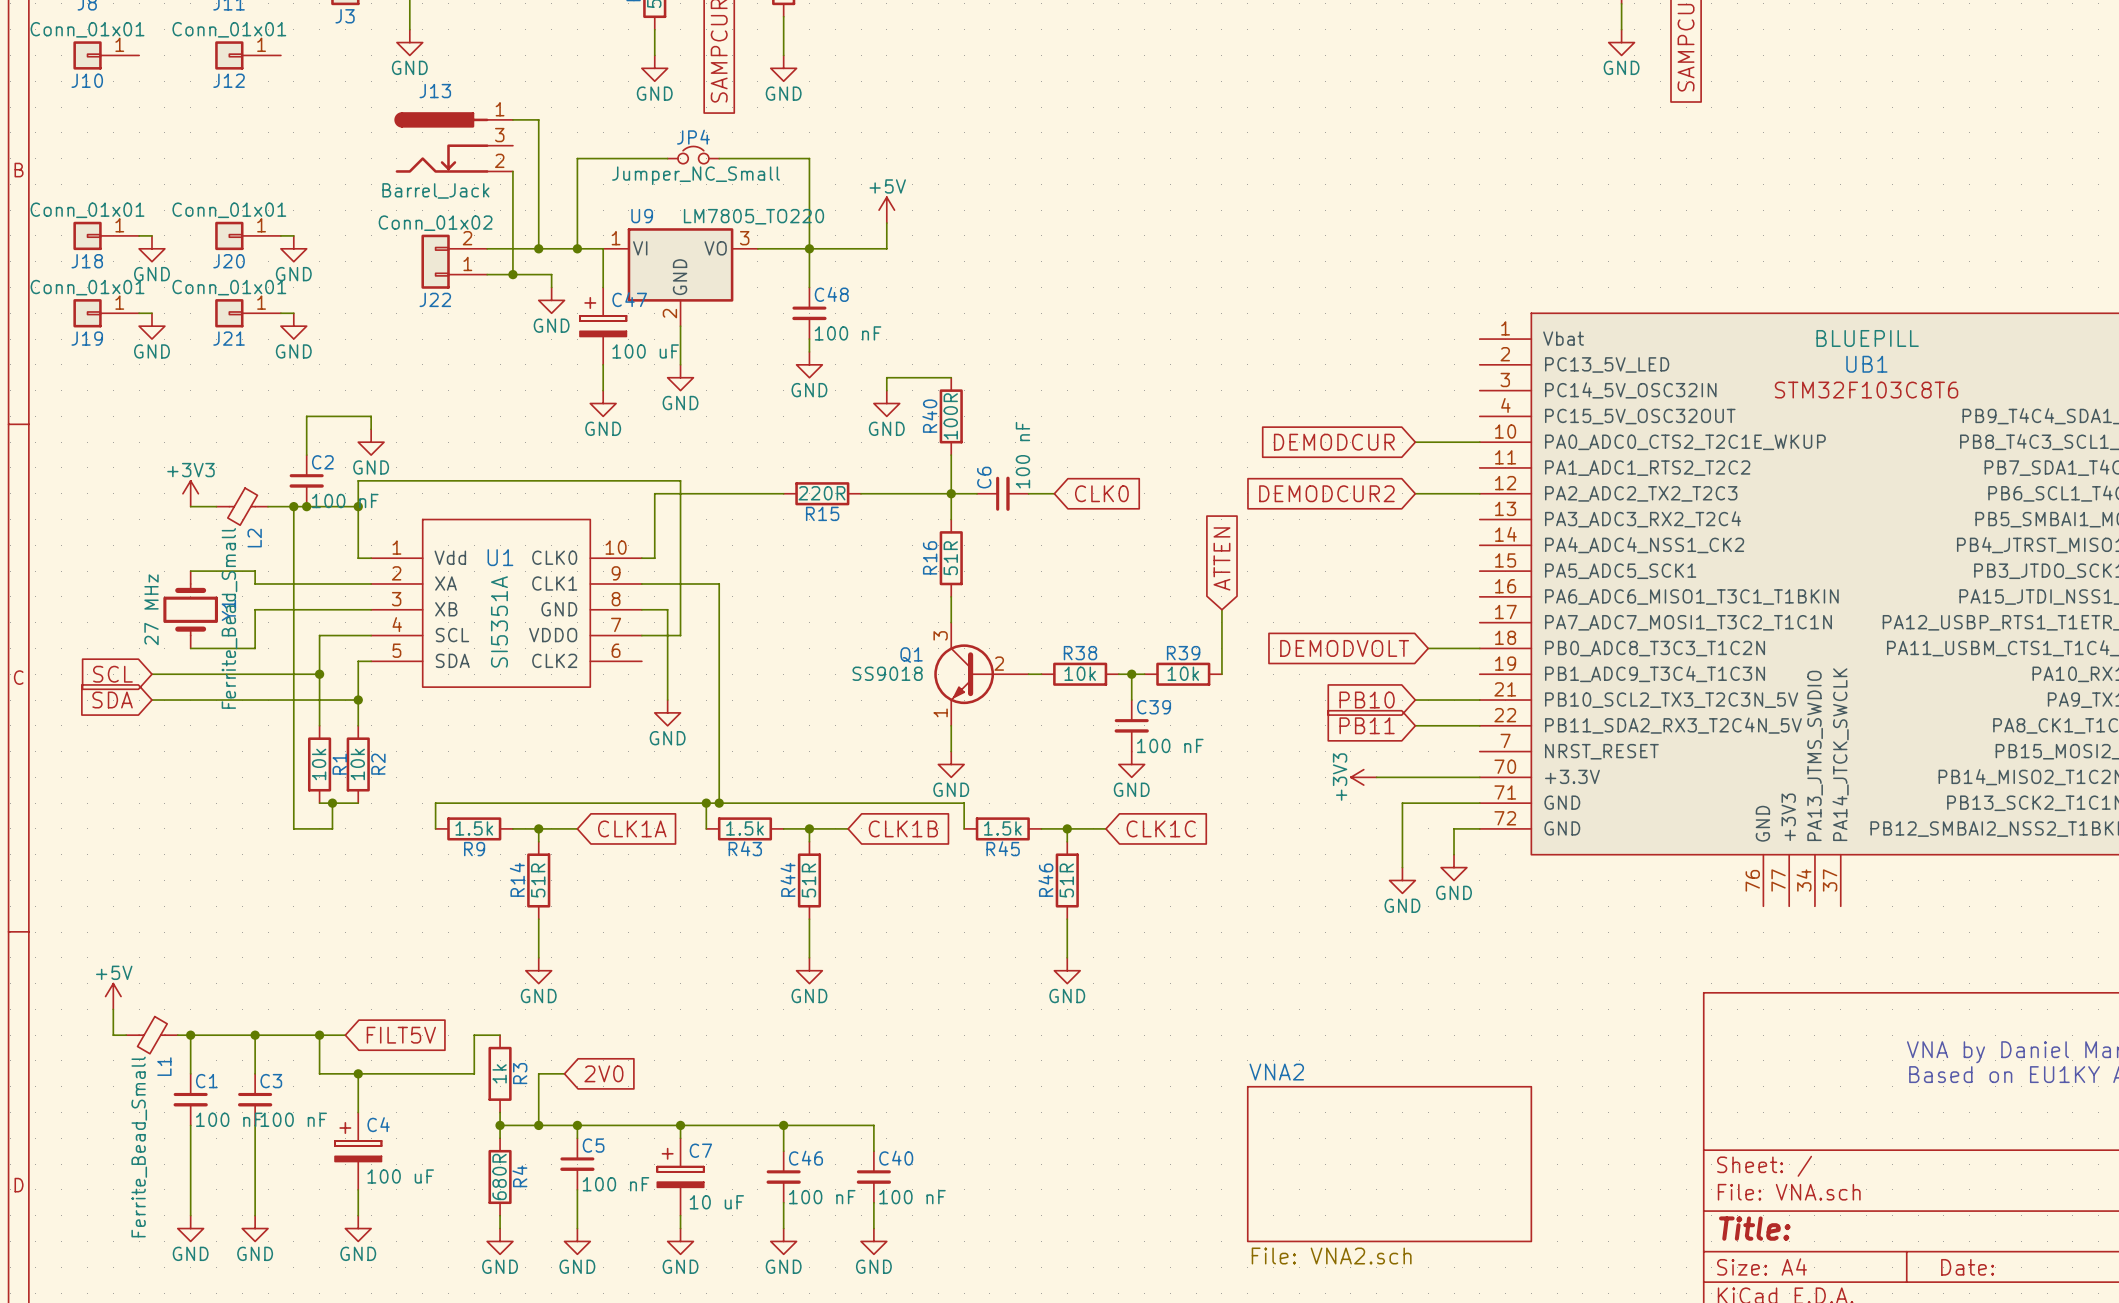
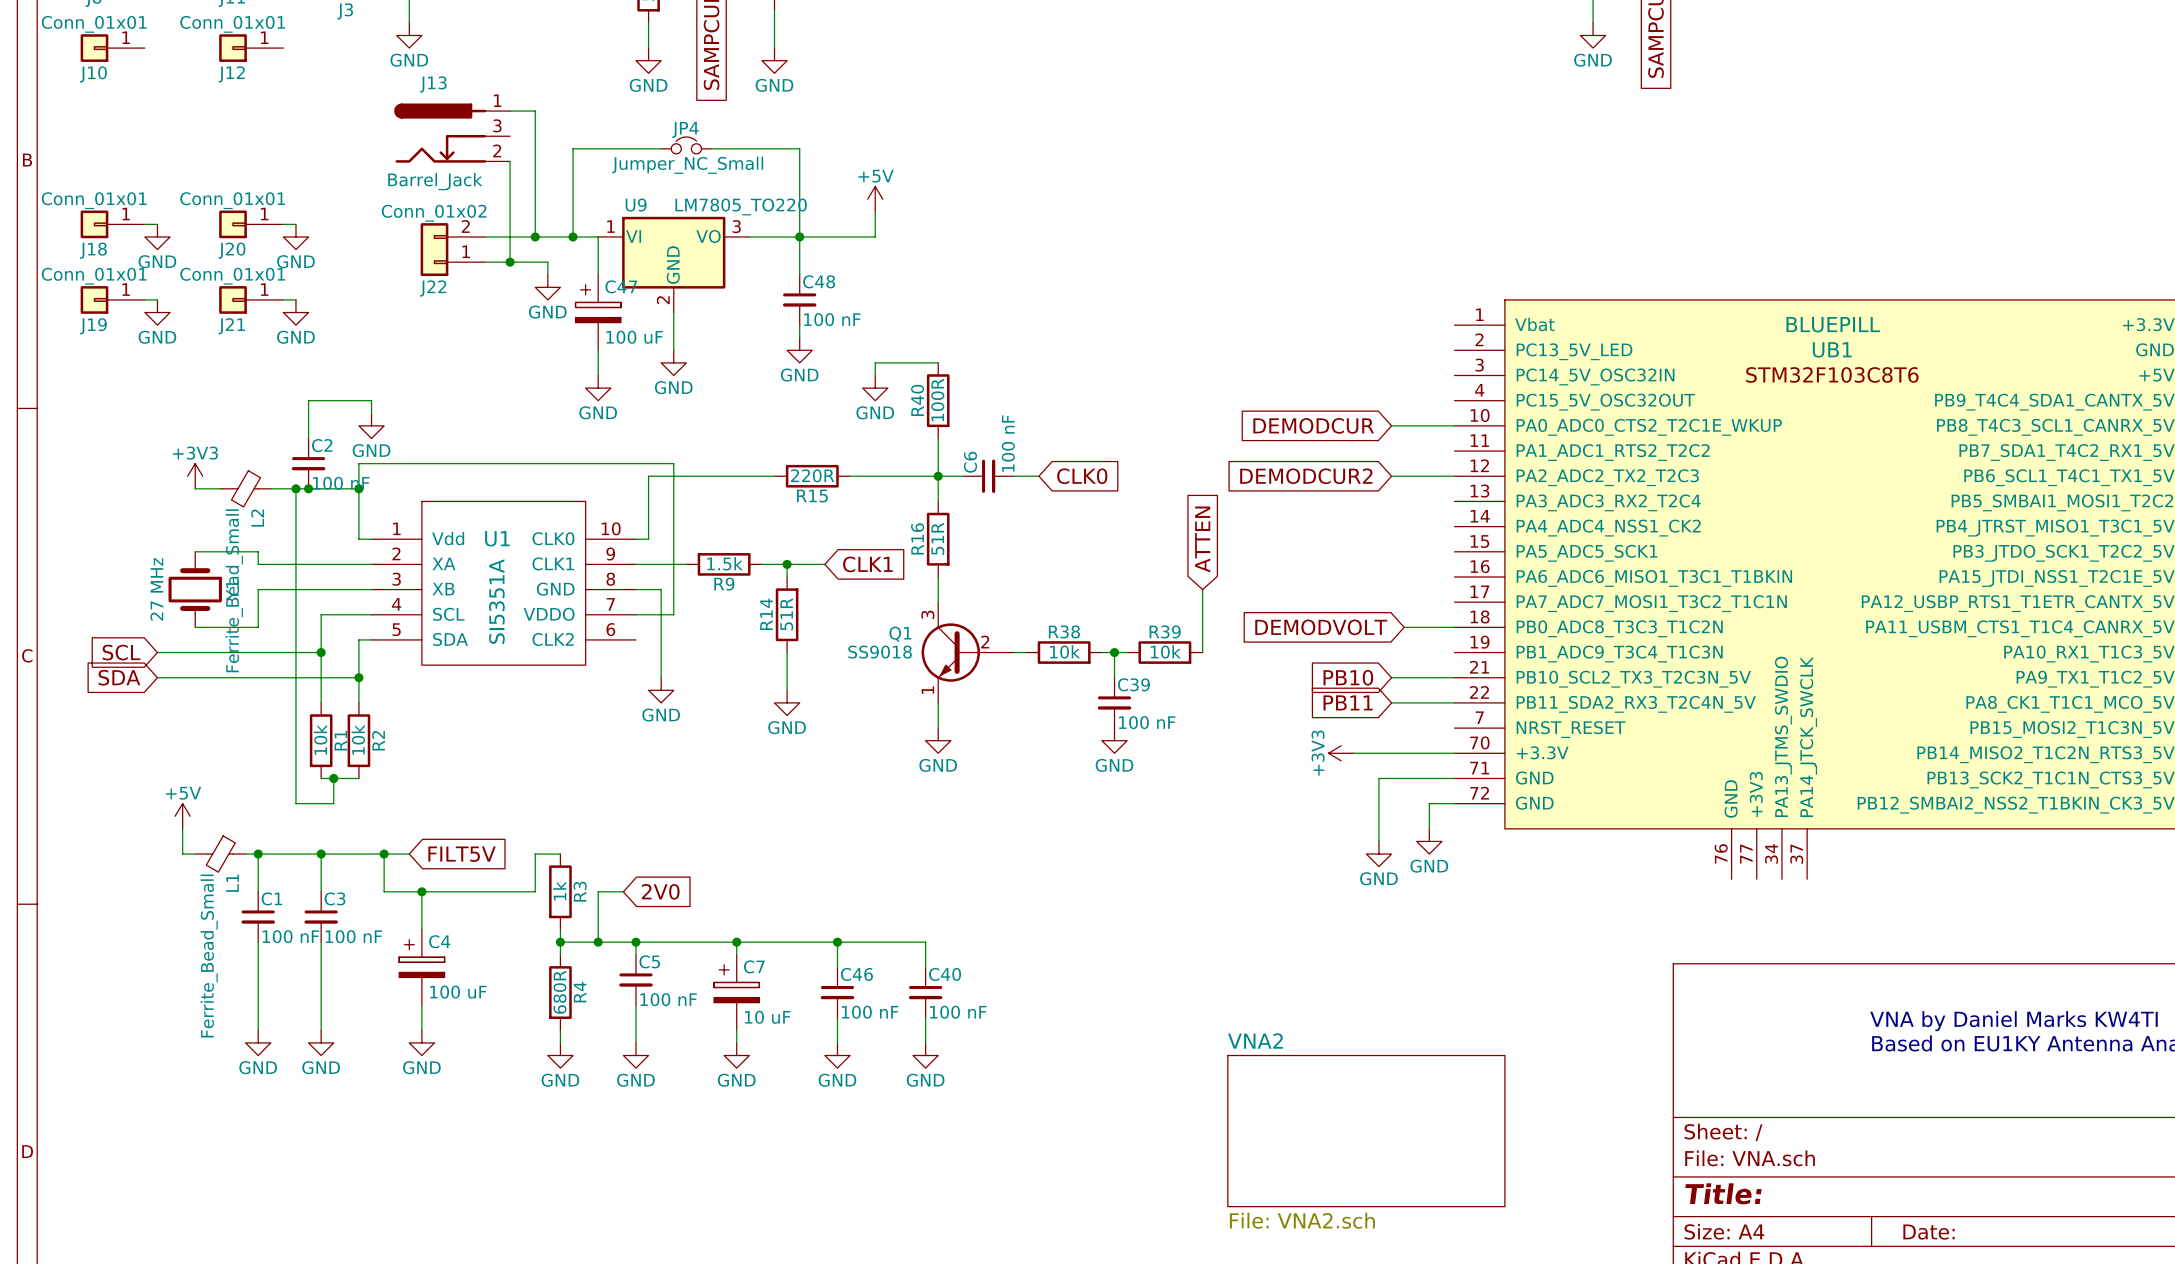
wire: (693, 583) (719, 583) (719, 803) -> none
junction: none -> (787, 564)
global label: none -> CLK1 (867, 564)
power symbol: none -> GND (787, 702)
wire: (706, 803) (706, 828) -> none
junction: (706, 803) -> none
junction: (719, 803) -> none
wire: (435, 828) (435, 803) (964, 803) (964, 828) -> none
R9 position: (474, 828) -> (724, 564)
wire: (512, 828) (577, 828) -> none
wire: (538, 828) (538, 841) -> none
junction: (538, 828) -> none
global label: CLK1A (632, 828) -> none
R43: 1.5k (744, 828) -> none
wire: (783, 828) (848, 828) -> (761, 564) (824, 564)
wire: (809, 828) (809, 841) -> (787, 564) (787, 576)
junction: (809, 828) -> none
global label: CLK1B (903, 828) -> none
R45: 1.5k (1002, 828) -> none
wire: (1041, 828) (1105, 828) -> none
wire: (1067, 828) (1067, 841) -> none
junction: (1067, 828) -> none
global label: CLK1C (1161, 828) -> none
junction: none -> (258, 854)
junction: none -> (321, 854)
wire: none -> (384, 854) (384, 891) (535, 891) (535, 854) (560, 854)
junction: none -> (384, 854)
R14 position: (538, 880) -> (787, 614)
R44: 51R (809, 880) -> none
R46: 51R (1067, 880) -> none
junction: none -> (421, 891)
wire: (538, 919) (538, 957) -> (321, 854) (321, 891)
wire: none -> (623, 891) (598, 891) (598, 942)
wire: (809, 919) (809, 957) -> (787, 652) (787, 690)
wire: (1067, 919) (1067, 957) -> none
wire: none -> (258, 942) (258, 1005)
wire: none -> (321, 942) (321, 1005)
power symbol: GND (538, 970) -> none
junction: none -> (560, 942)
junction: none -> (598, 942)
junction: none -> (635, 942)
junction: none -> (736, 942)
power symbol: GND (809, 970) -> none
junction: none -> (837, 942)
power symbol: GND (1067, 970) -> none
power symbol position: +5V (113, 996) -> +5V (182, 816)
wire: (113, 1009) (113, 1035) (126, 1035) -> (182, 828) (182, 854) (195, 854)
L1 position: (151, 1035) -> (220, 854)
wire: (177, 1035) (345, 1035) -> (245, 854) (409, 854)
wire: (190, 1035) (190, 1073) -> (258, 854) (258, 891)
junction: (190, 1035) -> none
junction: (255, 1035) -> none
junction: (319, 1035) -> none
global label position: FILT5V (401, 1035) -> FILT5V (462, 854)
wire: (500, 1035) (474, 1035) (474, 1073) (319, 1073) (319, 1060) -> none
power symbol: none -> GND (258, 1042)
power symbol: none -> GND (321, 1042)
wire: (358, 1073) (358, 1112) -> (421, 891) (421, 929)
junction: (358, 1073) -> none
power symbol: none -> GND (421, 1042)
R3 position: (500, 1073) -> (560, 891)
wire: (564, 1073) (538, 1073) (538, 1125) -> (560, 1042) (560, 1030)
global label position: 2V0 (603, 1073) -> 2V0 (660, 891)
power symbol: none -> GND (560, 1055)
power symbol: none -> GND (635, 1055)
power symbol: none -> GND (736, 1055)
power symbol: none -> GND (837, 1055)
power symbol: none -> GND (925, 1055)
C1 position: (190, 1099) -> (258, 916)
C3 position: (255, 1099) -> (321, 916)
wire: (500, 1112) (500, 1138) -> (560, 929) (560, 954)
wire: (190, 1125) (190, 1215) -> none
wire: (255, 1125) (255, 1215) -> none
wire: (500, 1125) (873, 1125) (873, 1151) -> (560, 942) (925, 942) (925, 967)
junction: (500, 1125) -> none
junction: (538, 1125) -> none
wire: (577, 1125) (577, 1138) -> (635, 942) (635, 954)
junction: (577, 1125) -> none
wire: (680, 1125) (680, 1138) -> (736, 942) (736, 954)
junction: (680, 1125) -> none
wire: (783, 1125) (783, 1151) -> (837, 942) (837, 967)
junction: (783, 1125) -> none
C4 position: (358, 1151) -> (421, 967)
C5 position: (577, 1164) -> (635, 979)
R4 position: (500, 1176) -> (560, 992)
C7 position: (680, 1176) -> (736, 992)
C46 position: (783, 1176) -> (837, 992)
C40 position: (873, 1176) -> (925, 992)
wire: (358, 1189) (358, 1215) -> (421, 1005) (421, 1030)
wire: (577, 1189) (577, 1228) -> (635, 1005) (635, 1042)
wire: (783, 1202) (783, 1228) -> (837, 1017) (837, 1042)
wire: (873, 1202) (873, 1228) -> (925, 1017) (925, 1042)
wire: (500, 1215) (500, 1228) -> none
wire: (680, 1215) (680, 1228) -> (736, 1030) (736, 1042)
power symbol: GND (190, 1228) -> none
power symbol: GND (255, 1228) -> none
power symbol: GND (358, 1228) -> none
power symbol: GND (500, 1241) -> none
power symbol: GND (577, 1241) -> none
power symbol: GND (680, 1241) -> none
power symbol: GND (783, 1241) -> none
power symbol: GND (873, 1241) -> none

